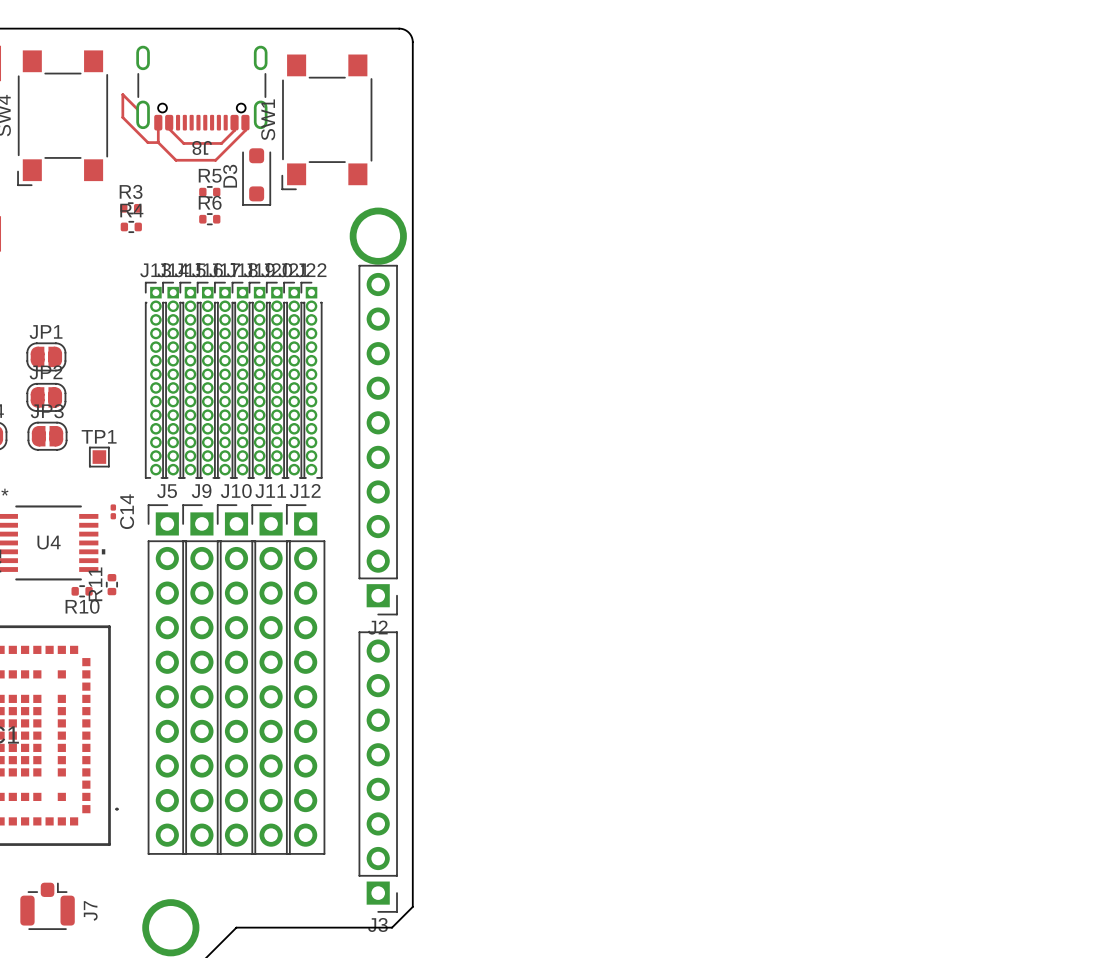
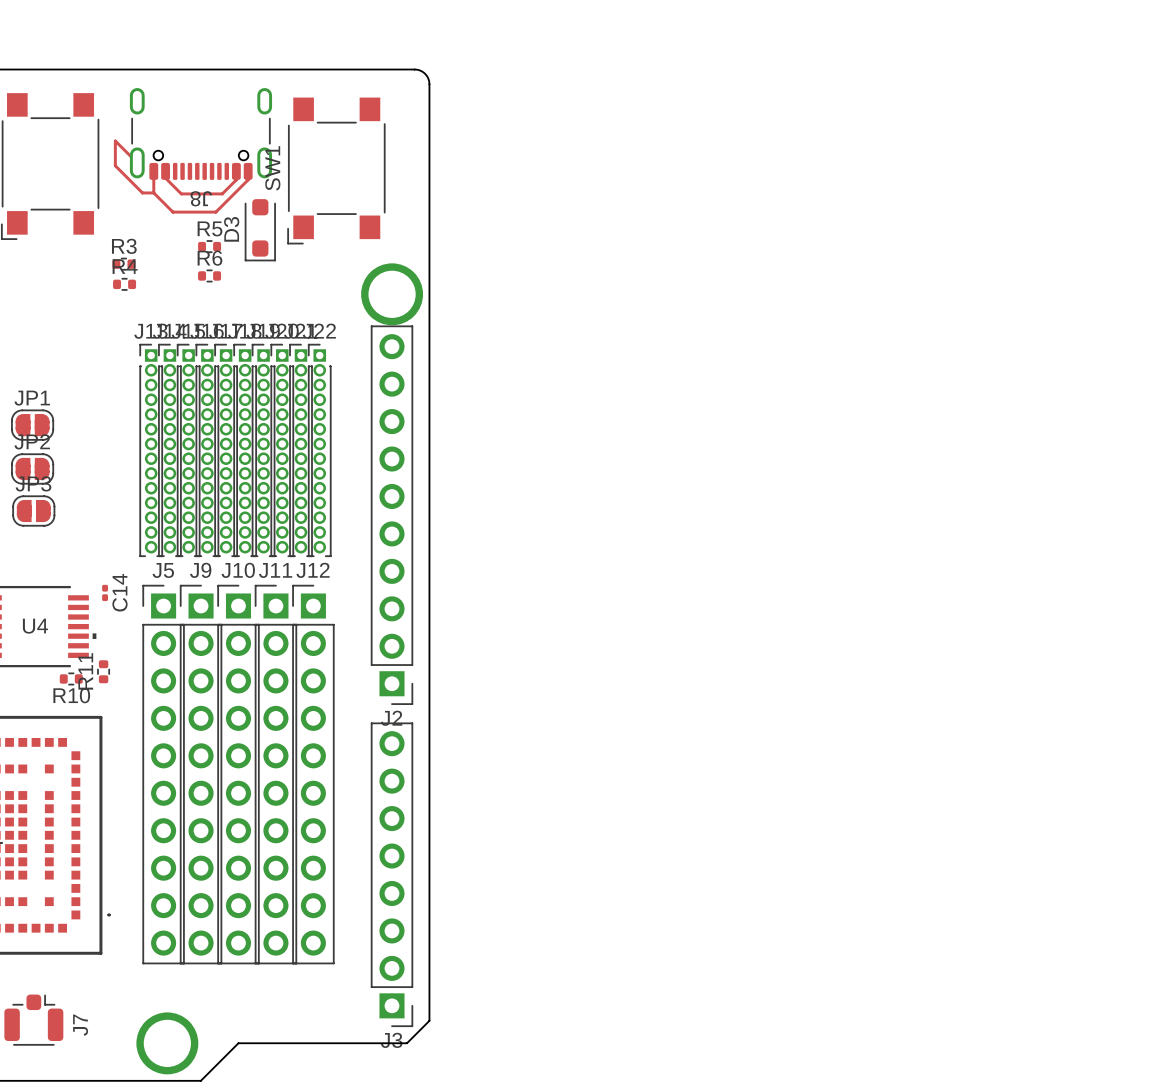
TP1: (99, 457) -> none

